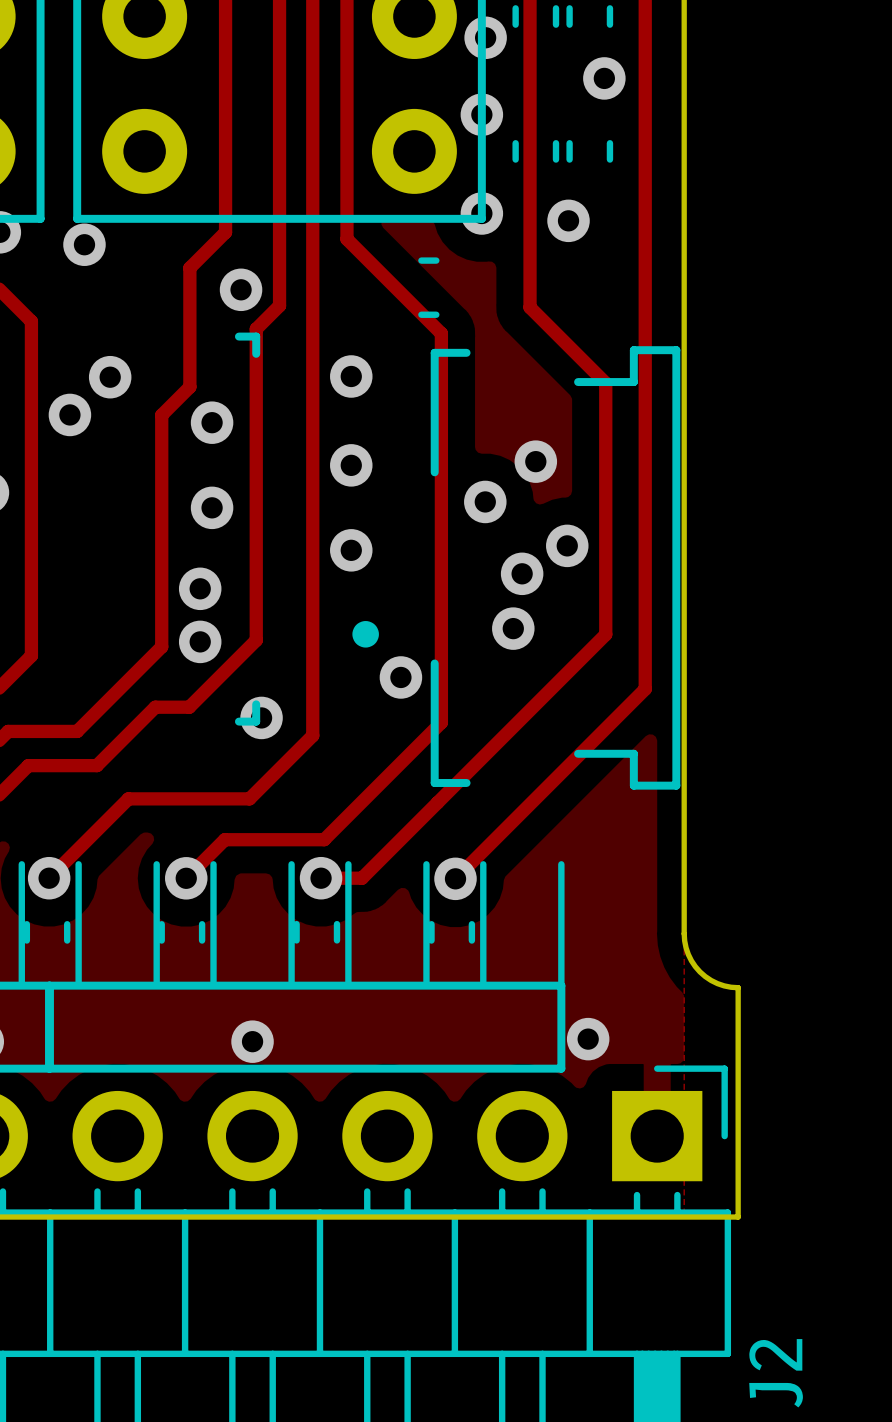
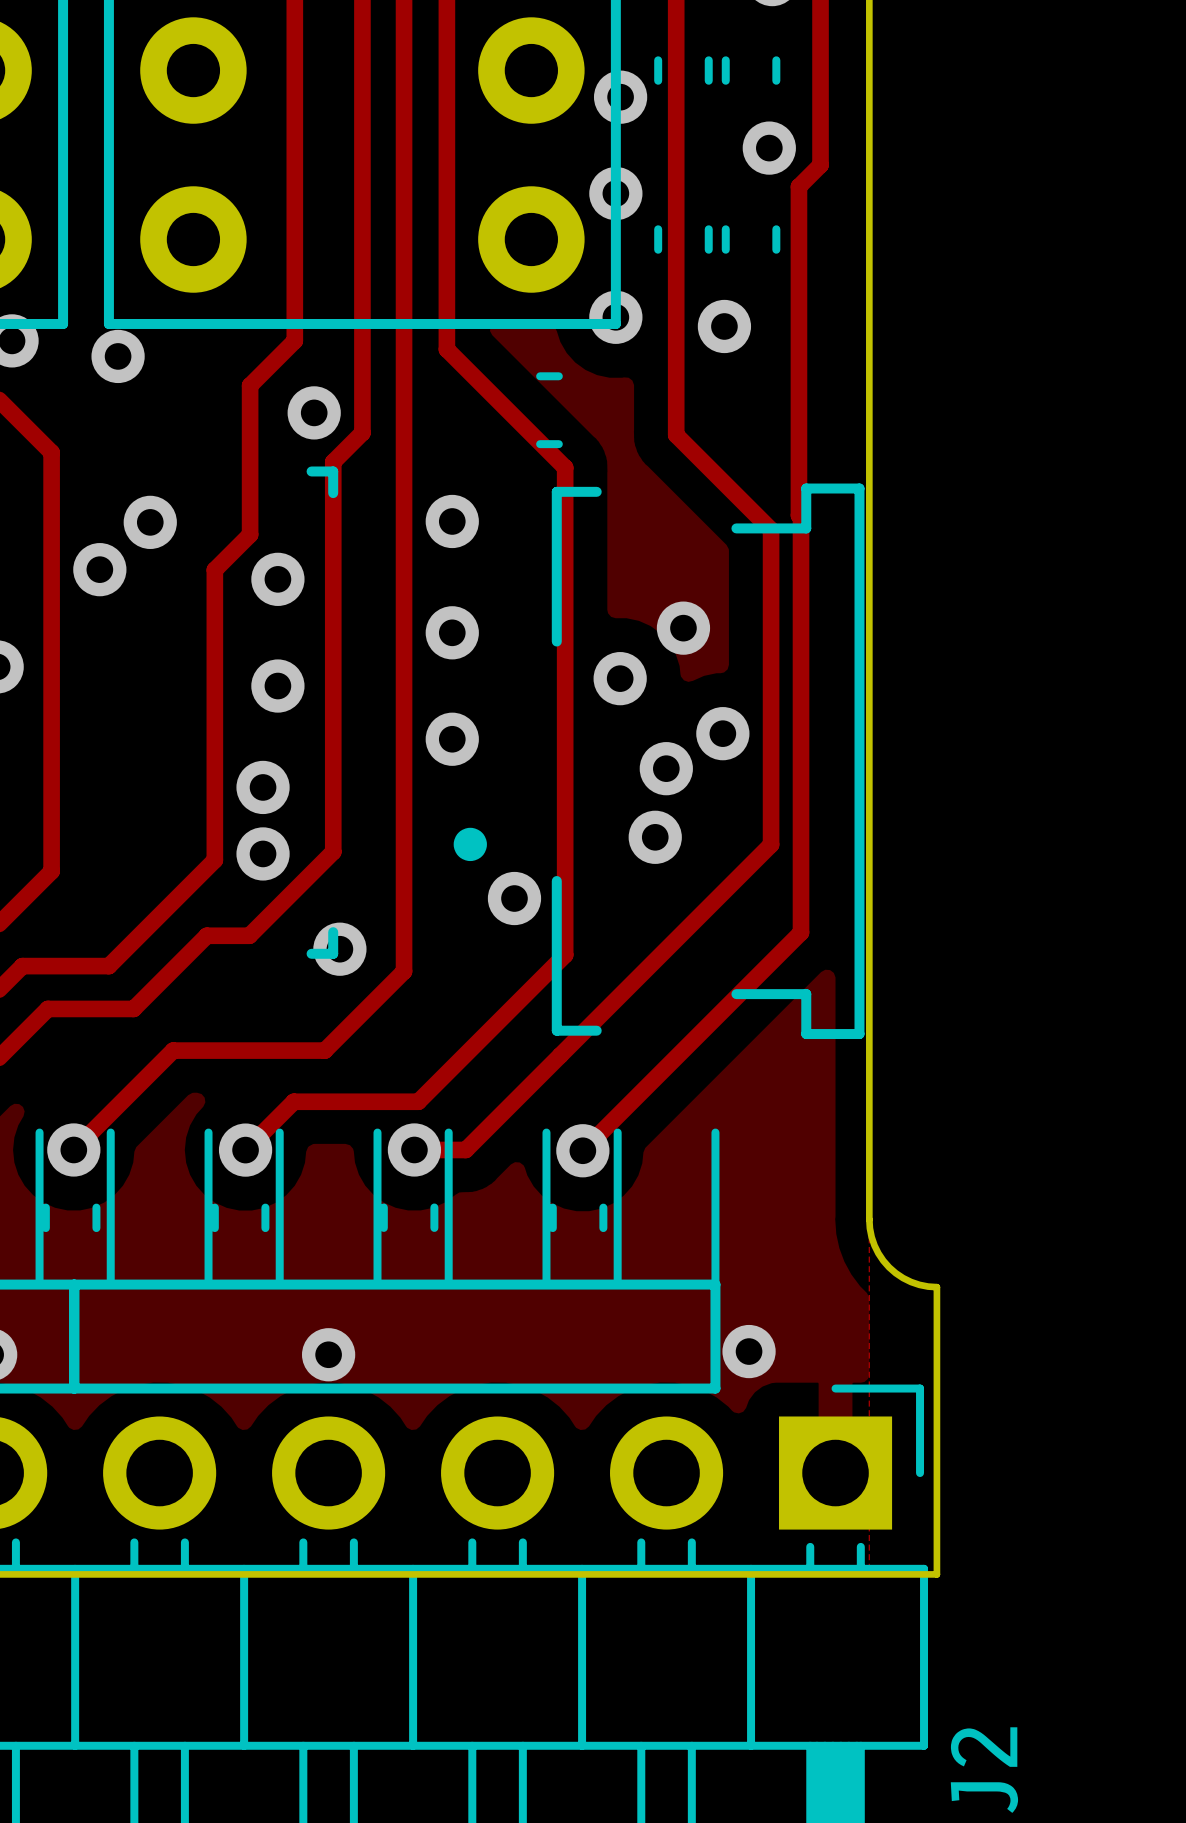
track: (645, 92) (645, 689) (629, 704) -> (820, 165) (798, 186) (801, 932)

